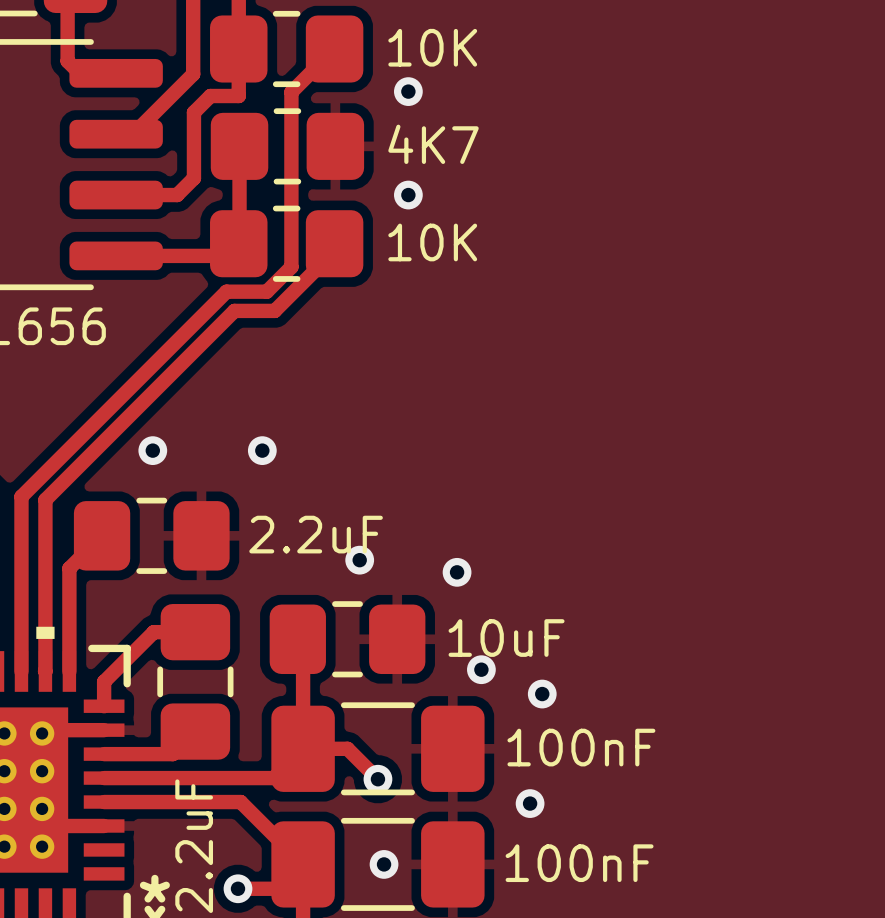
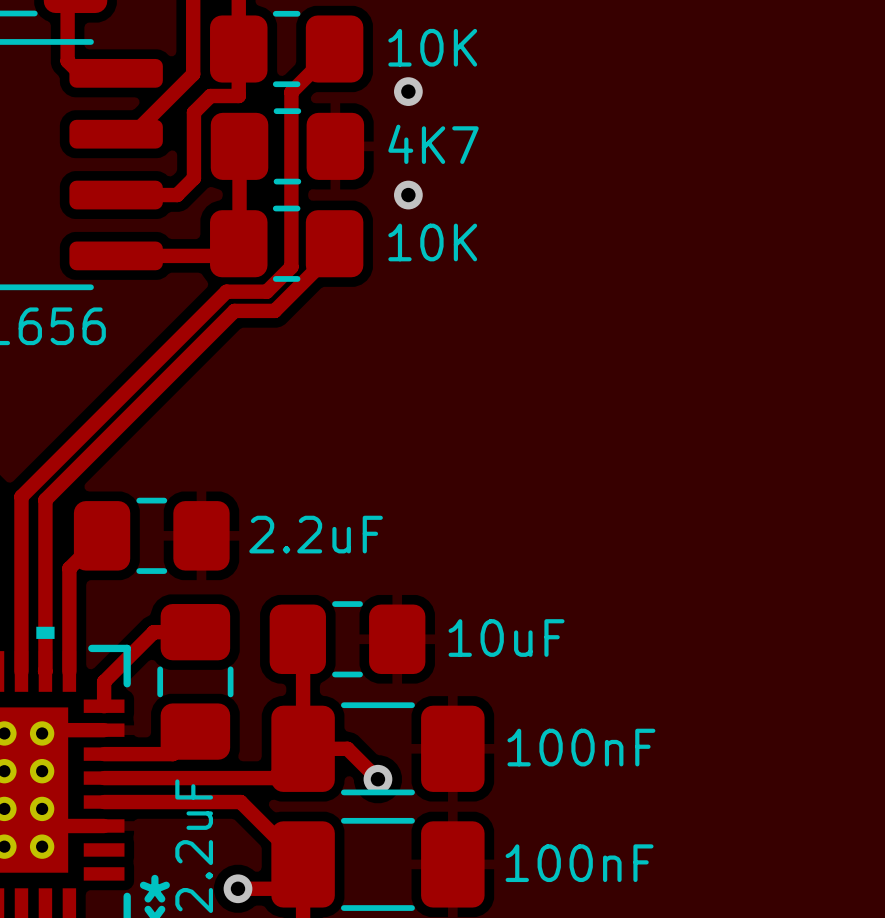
via: (152, 450) -> none
via: (262, 450) -> none
via: (359, 560) -> none
via: (457, 572) -> none
via: (481, 669) -> none
via: (542, 694) -> none
via: (530, 803) -> none
via: (384, 864) -> none

